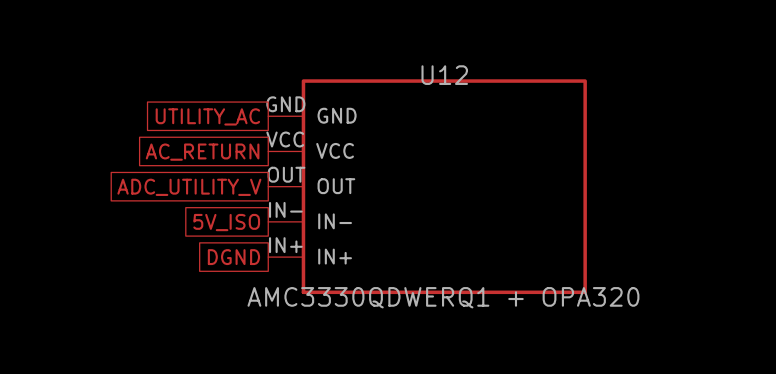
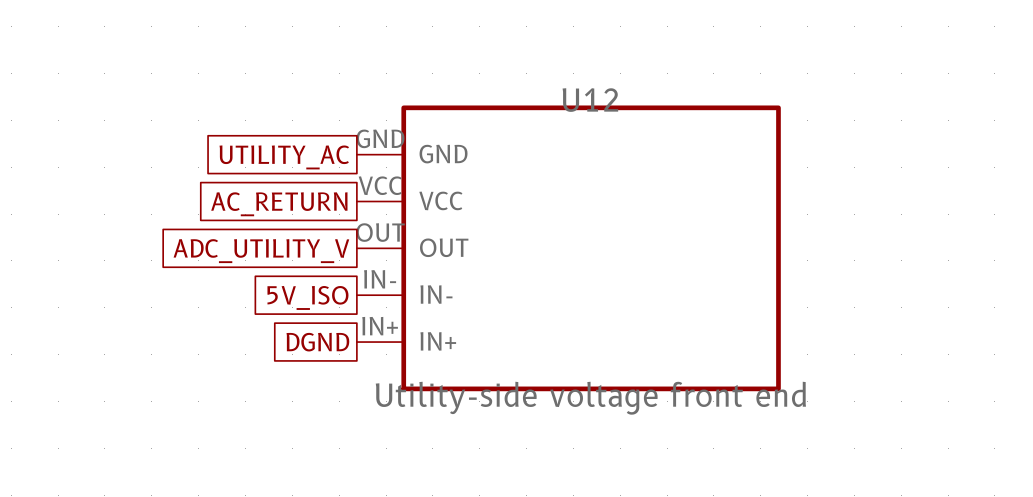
U12 value: AMC3330QDWERQ1 + OPA320 (443, 297) -> Utility-side voltage front end (590, 398)

